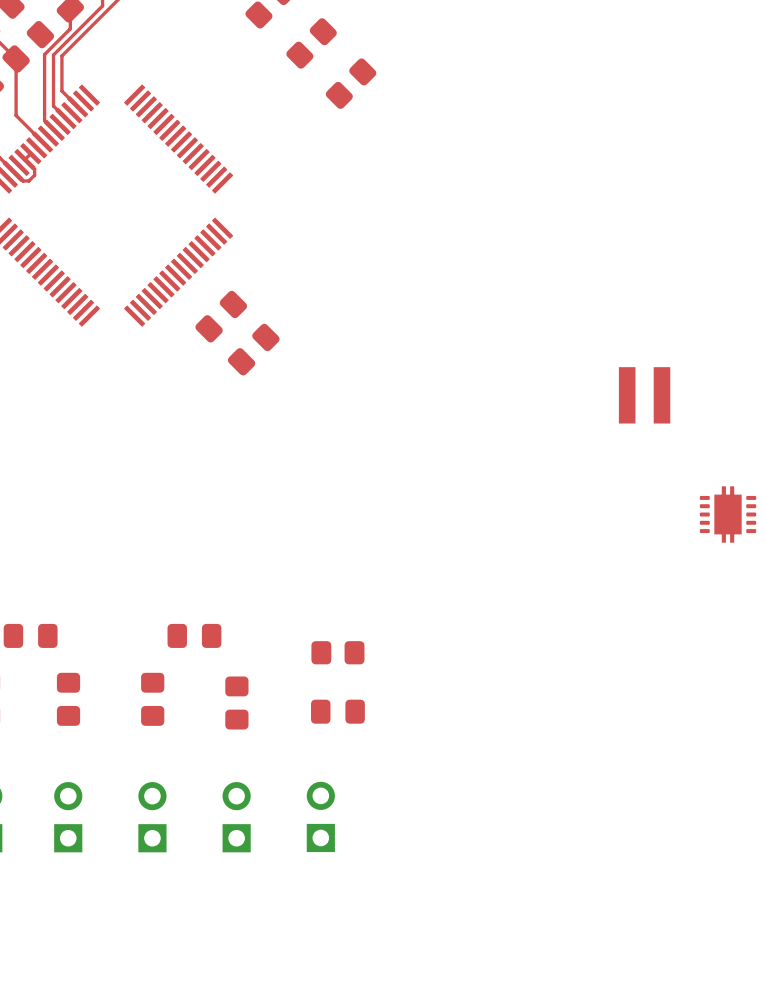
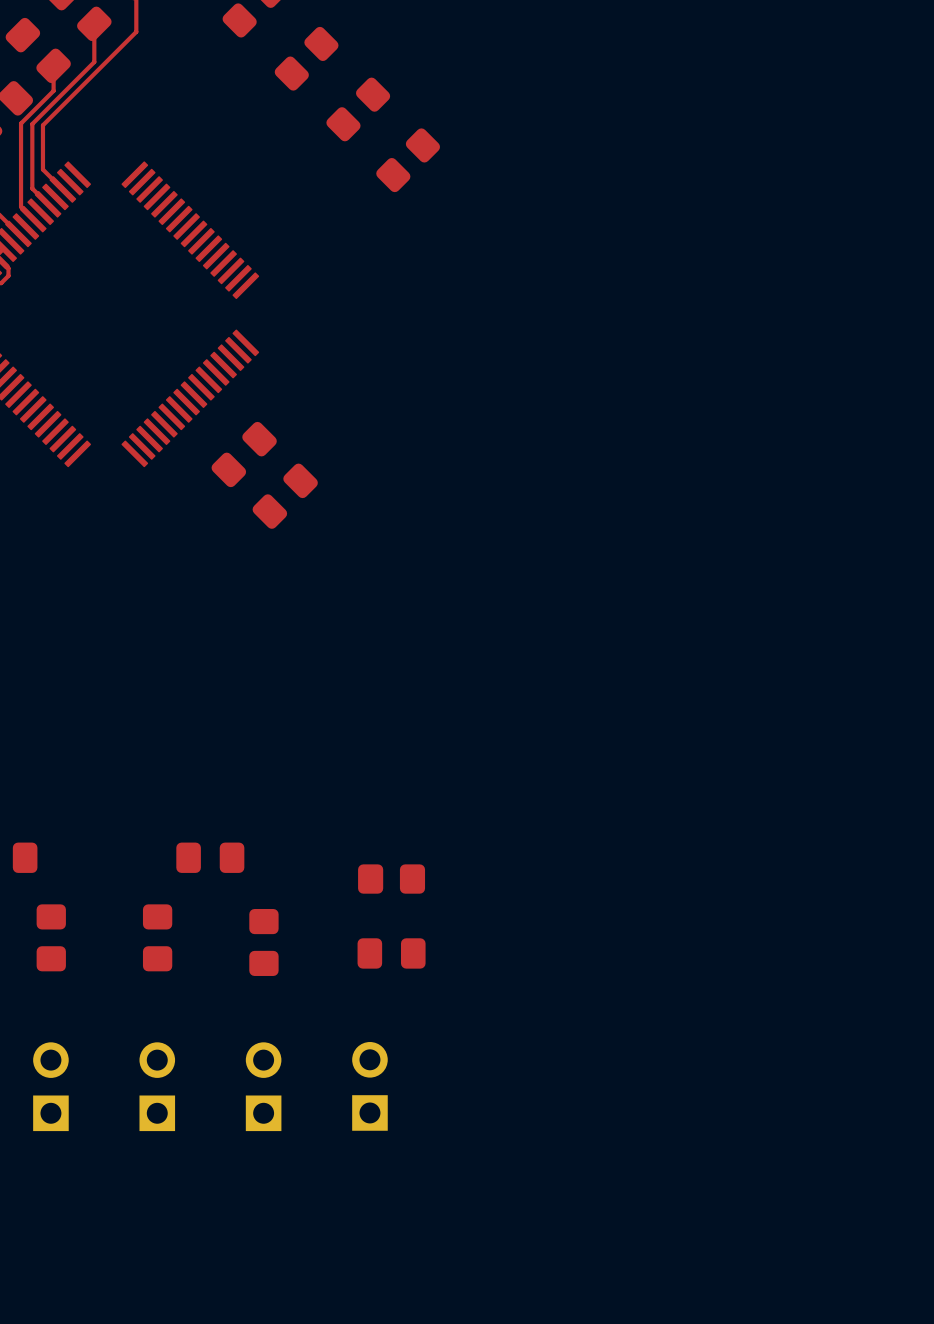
part: (644, 395) -> none
part: (728, 514) -> none

